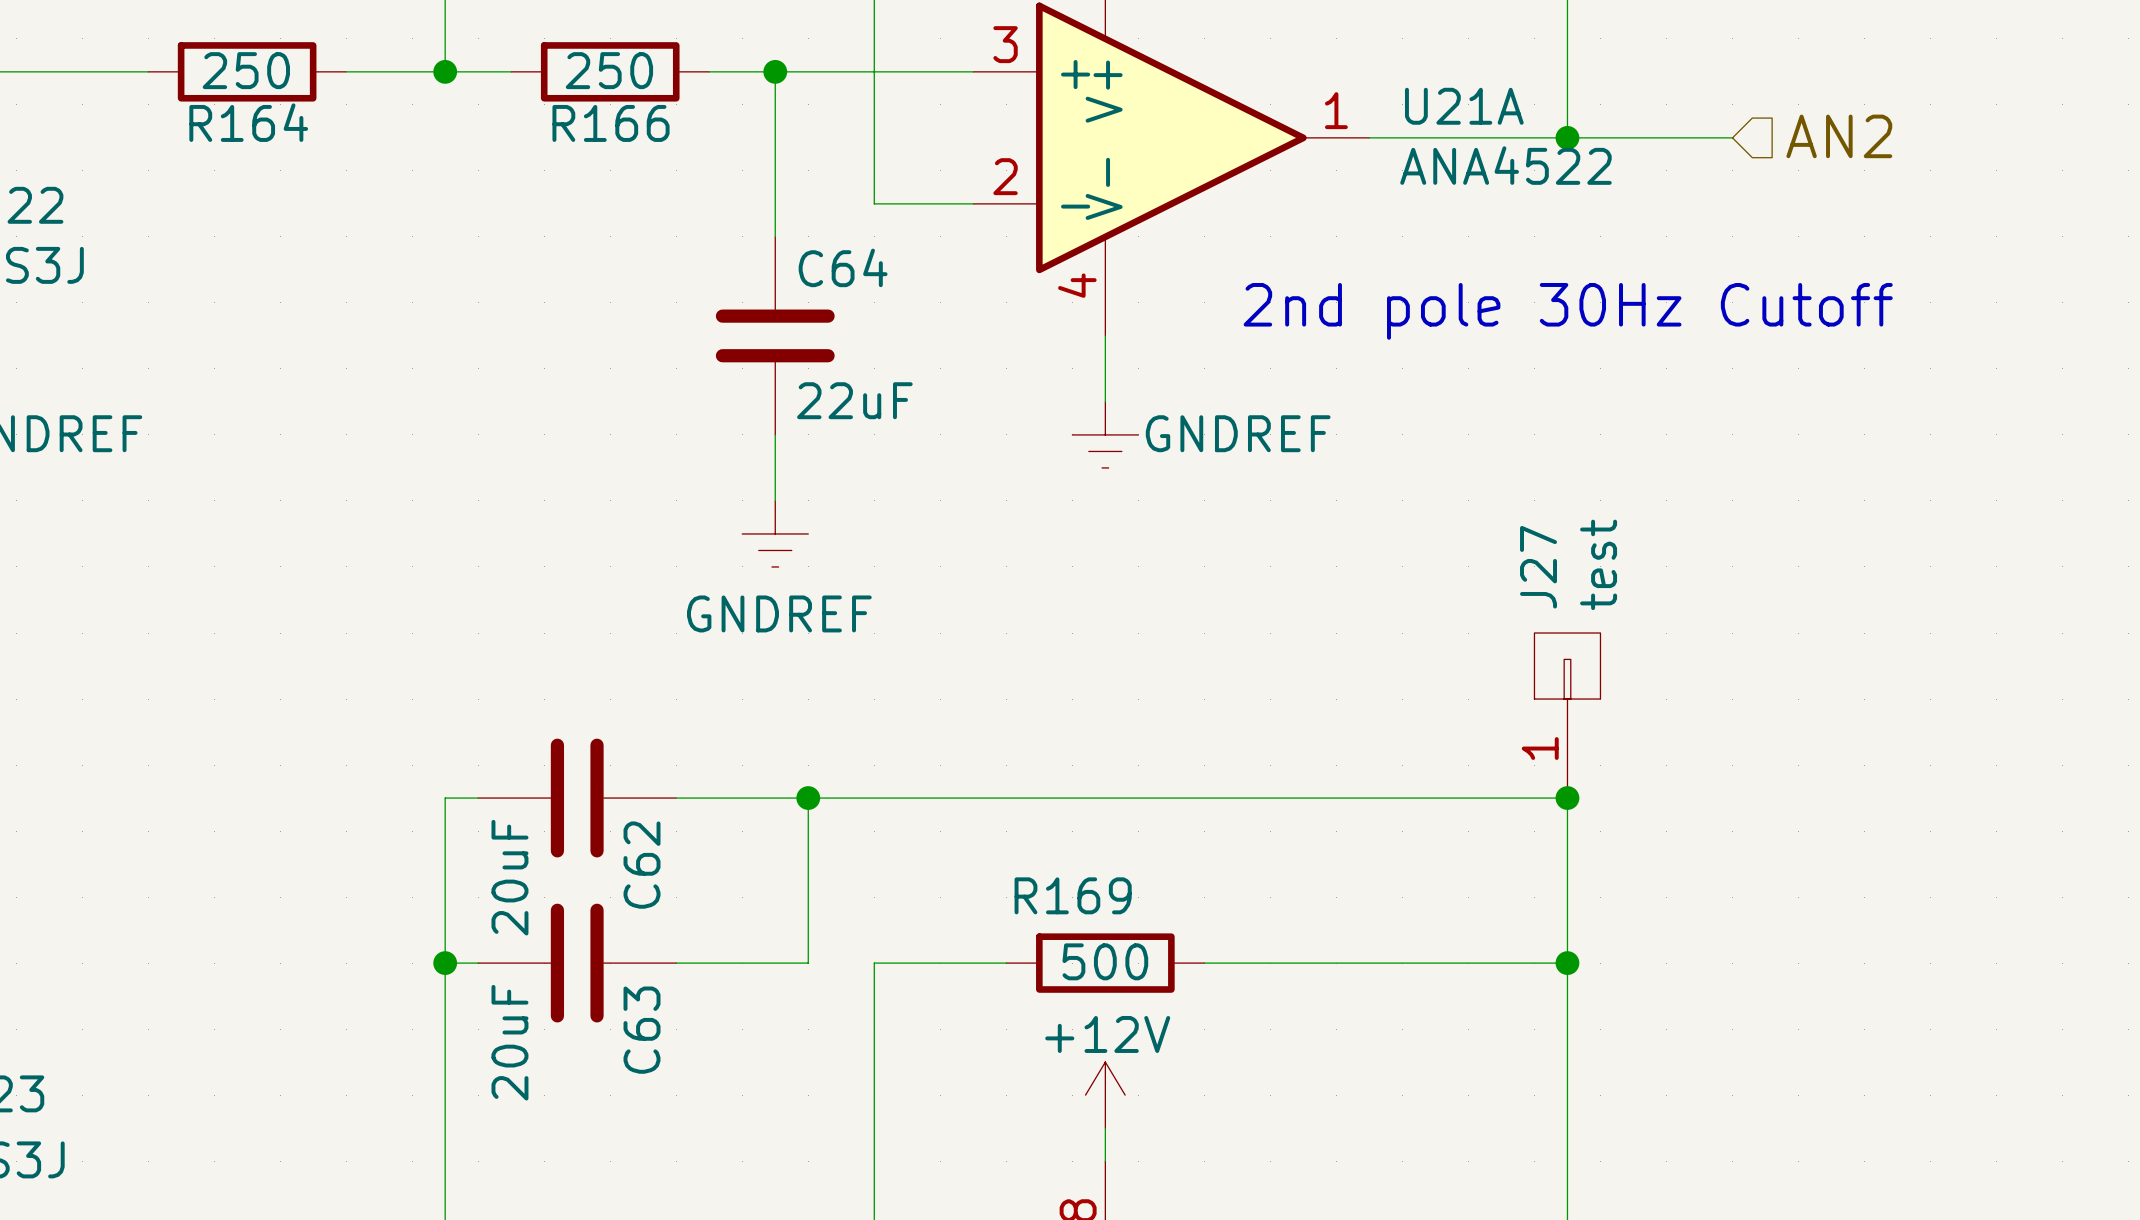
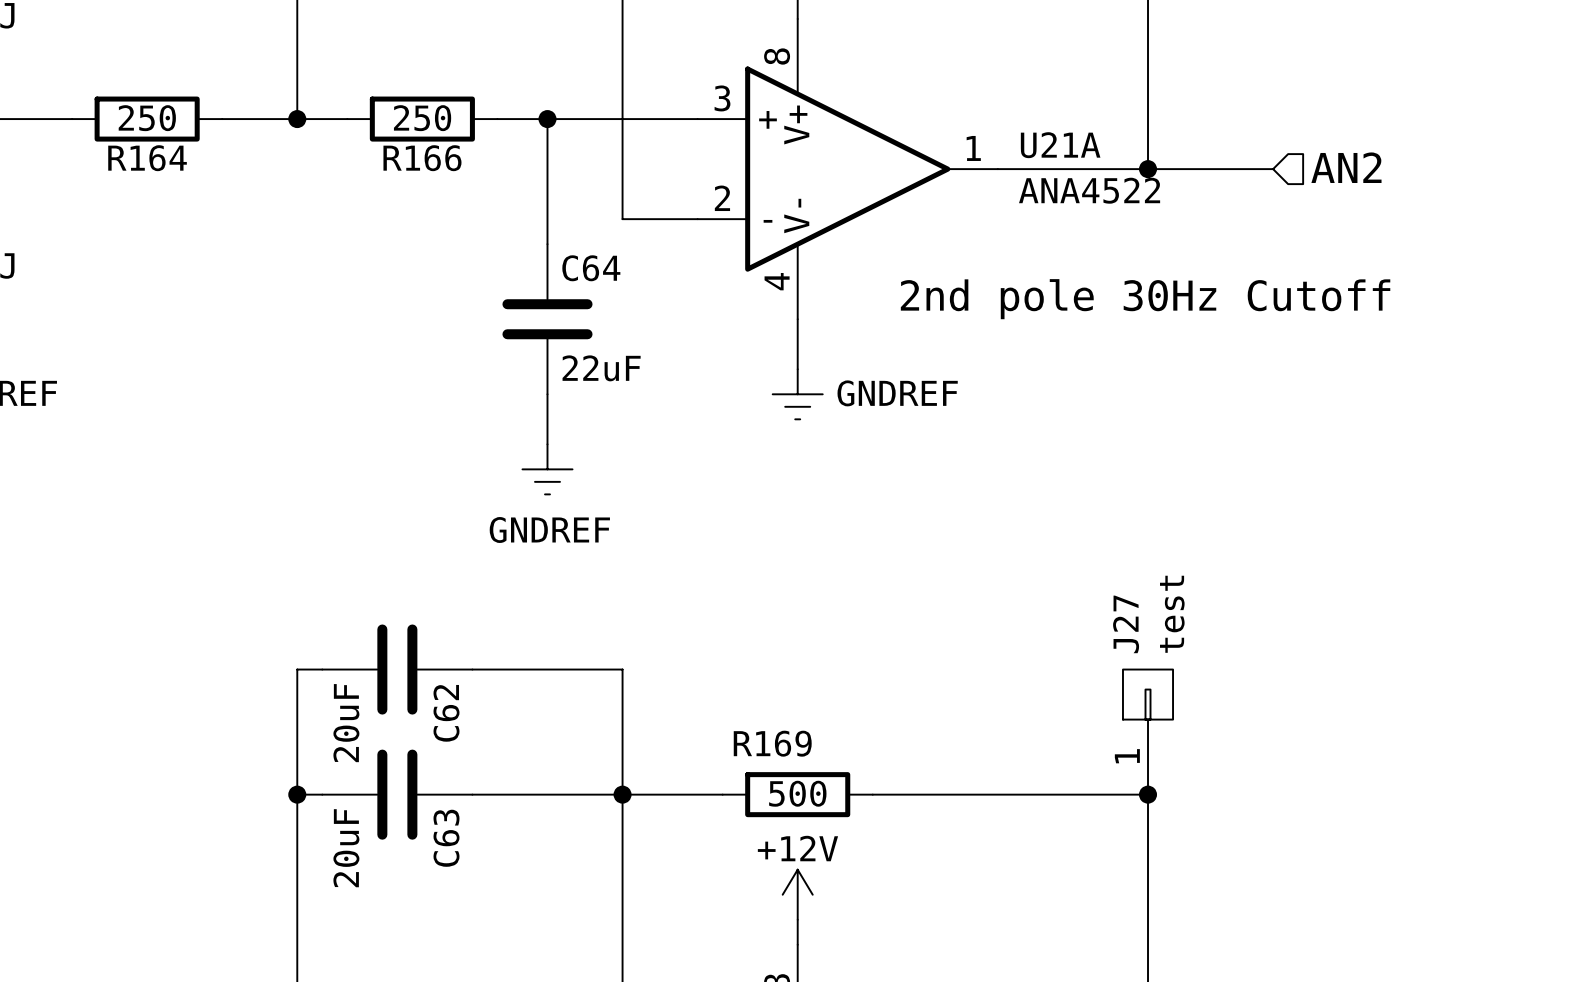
J27 position: (1567, 715) -> (1148, 732)
wire: (808, 798) (808, 963) -> (622, 669) (622, 794) (572, 794)
junction: (808, 798) -> none
wire: (874, 798) (1567, 798) (1567, 963) -> none
junction: (1567, 798) -> none
junction: none -> (622, 794)

